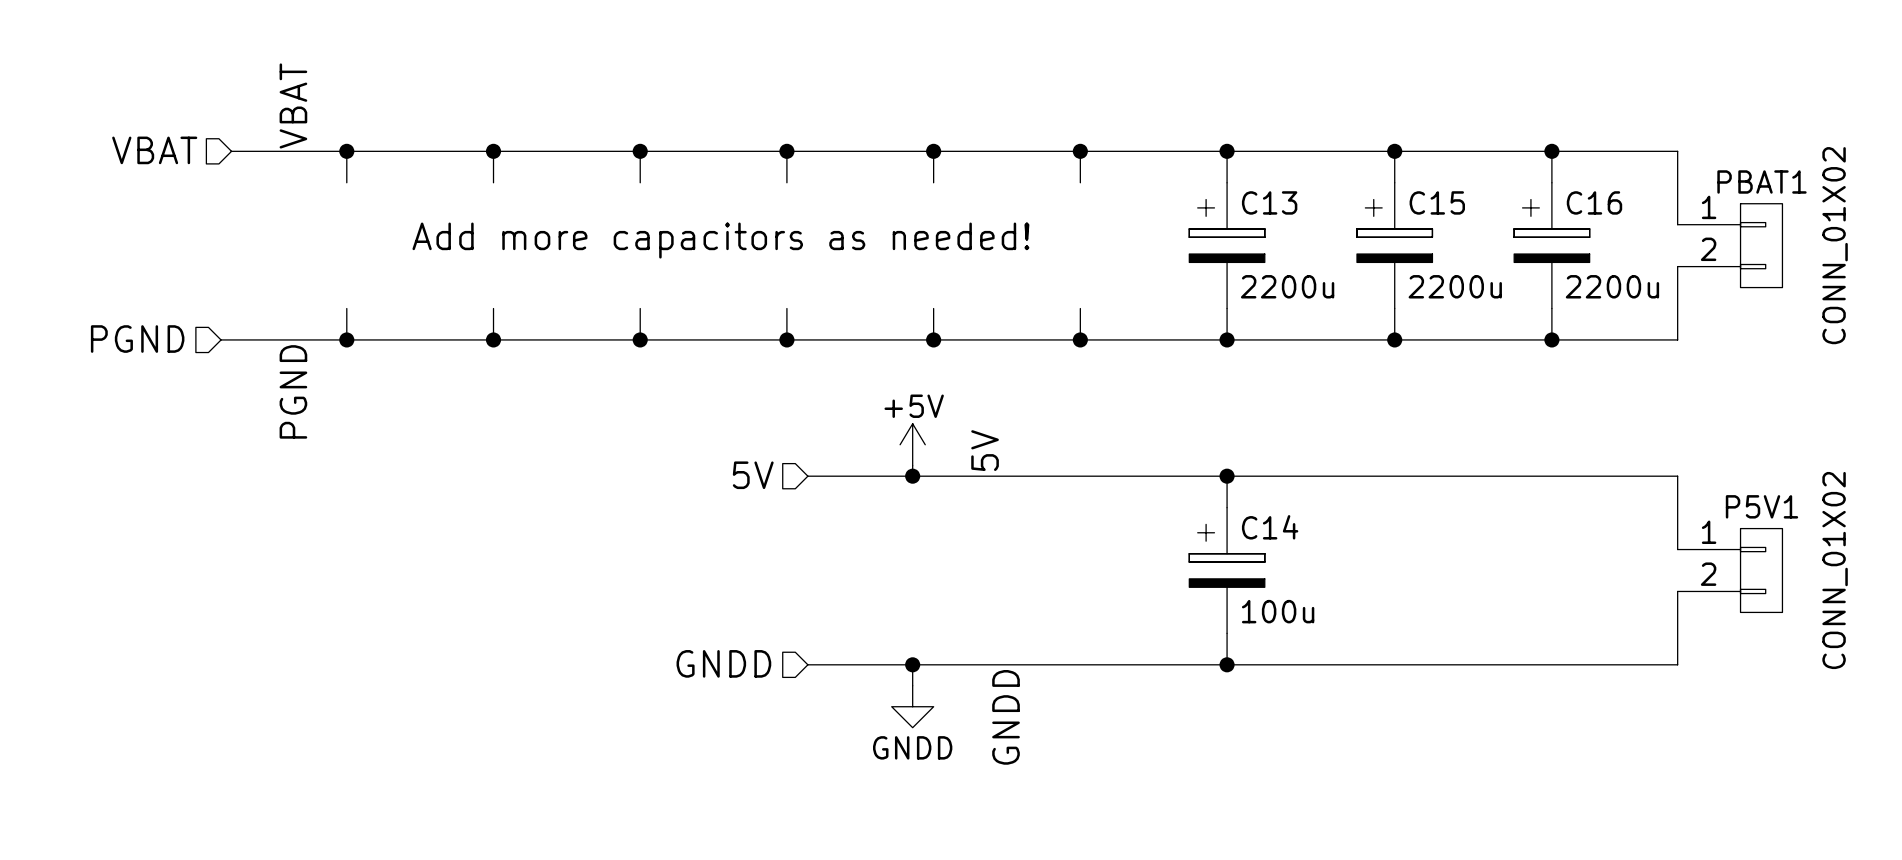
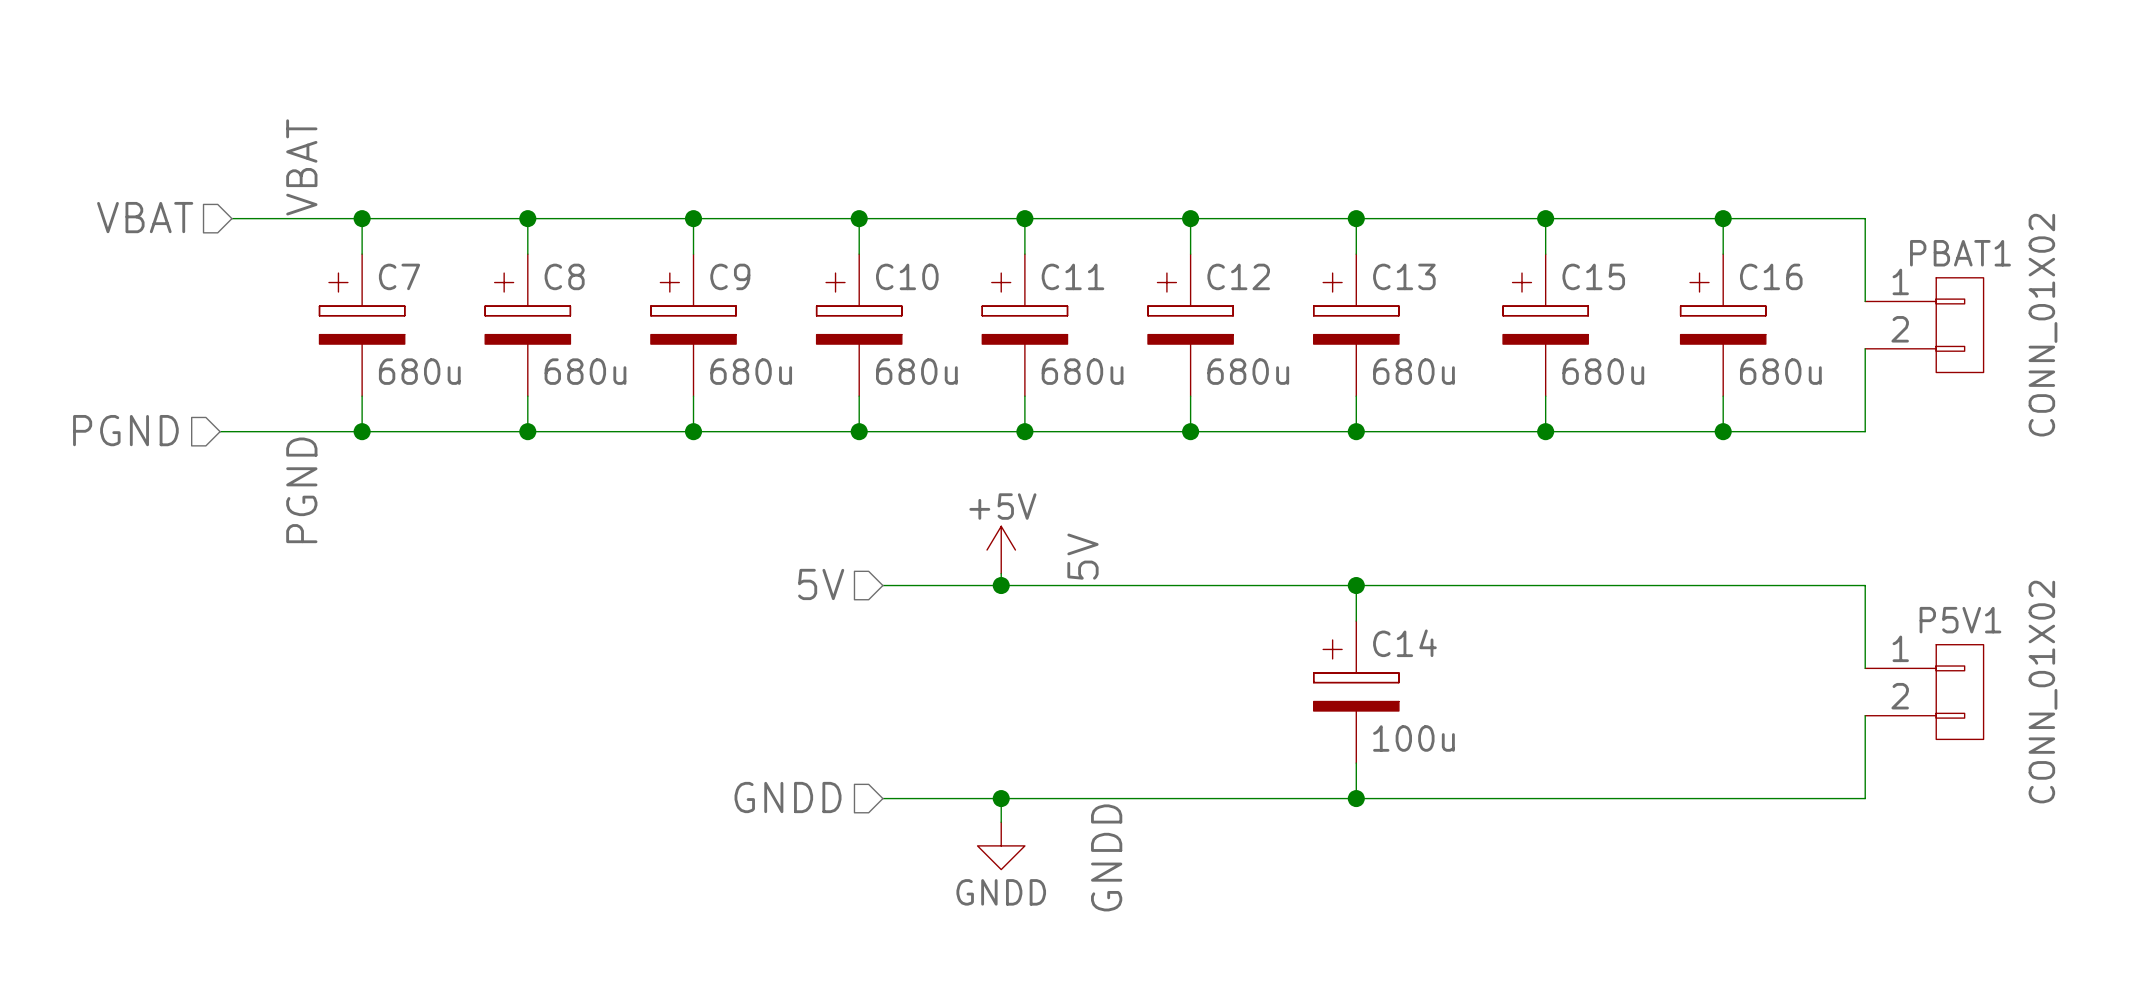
text: Add more capacitors as needed! (720, 240) -> none
C7: none -> 680u (362, 325)
C8: none -> 680u (527, 325)
C9: none -> 680u (693, 325)
C10: none -> 680u (859, 325)
C11: none -> 680u (1024, 325)
C12: none -> 680u (1190, 325)
C13 value: 2200u (1287, 286) -> 680u (1413, 371)
C15 value: 2200u (1455, 286) -> 680u (1603, 371)
C16 value: 2200u (1612, 286) -> 680u (1780, 371)

